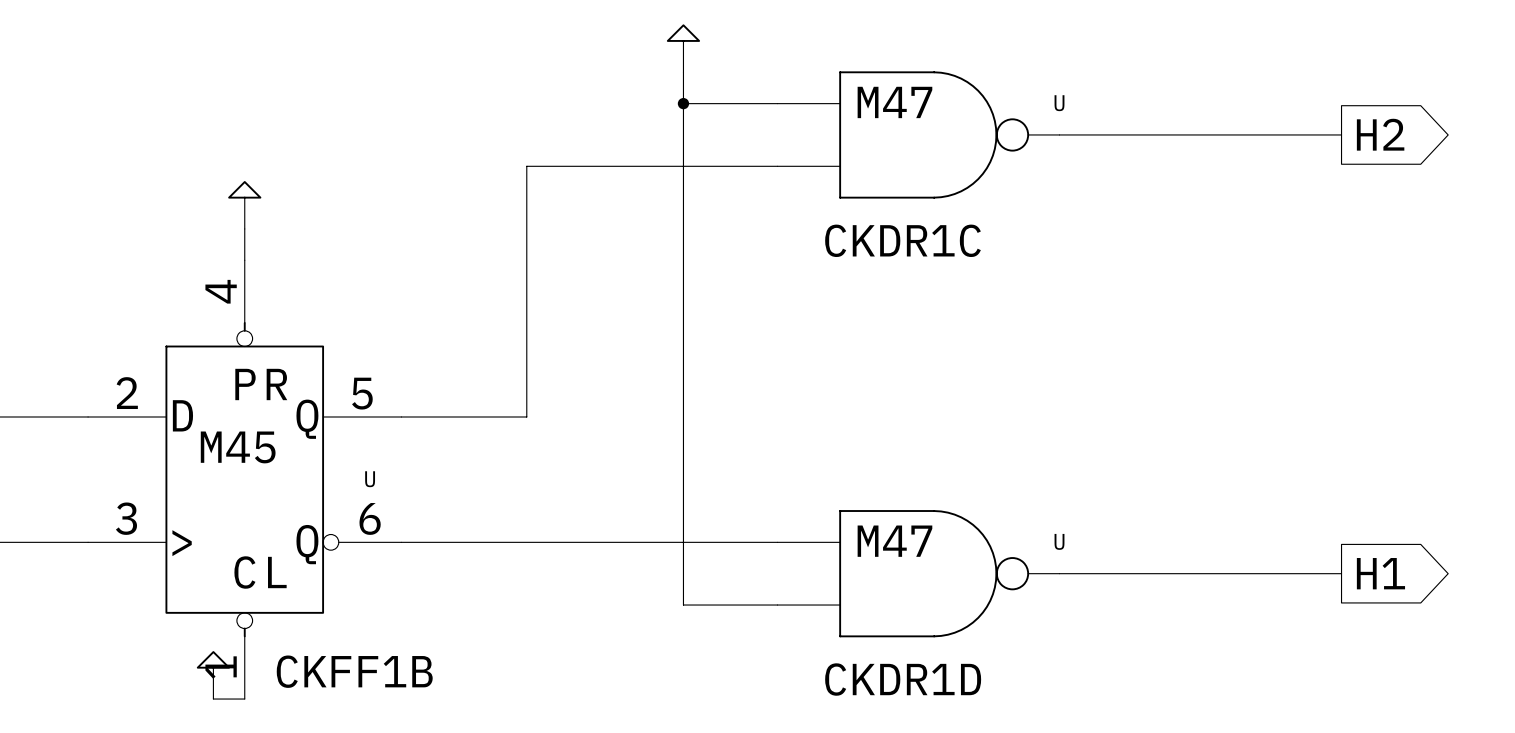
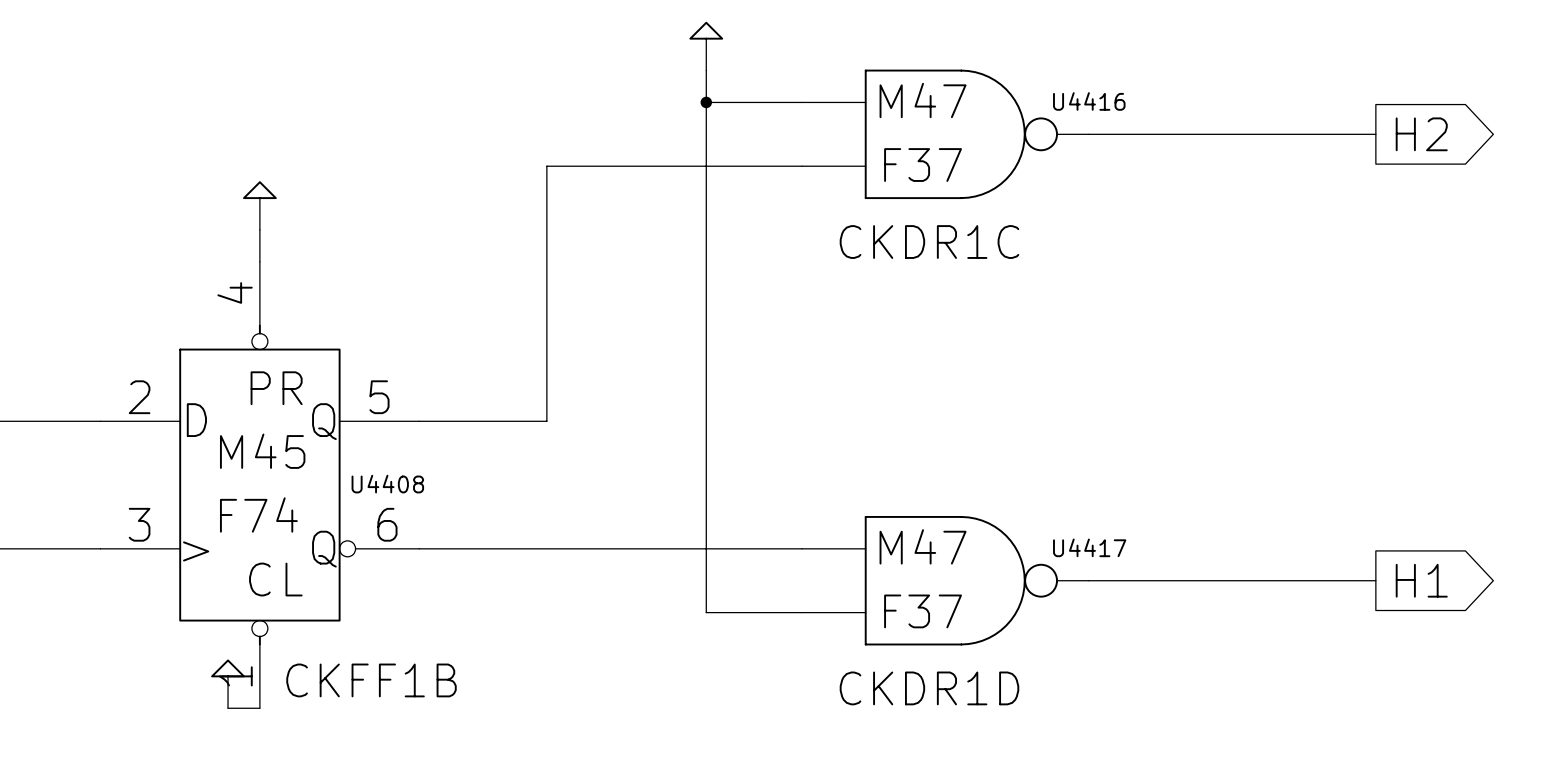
U name: U (1059, 103) -> U4416 (1089, 101)
U value: none -> F37 (923, 165)
U name: U (370, 479) -> U4408 (387, 484)
U value: none -> F74 (258, 515)
U name: U (1059, 541) -> U4417 (1089, 547)
U value: none -> F37 (923, 611)

